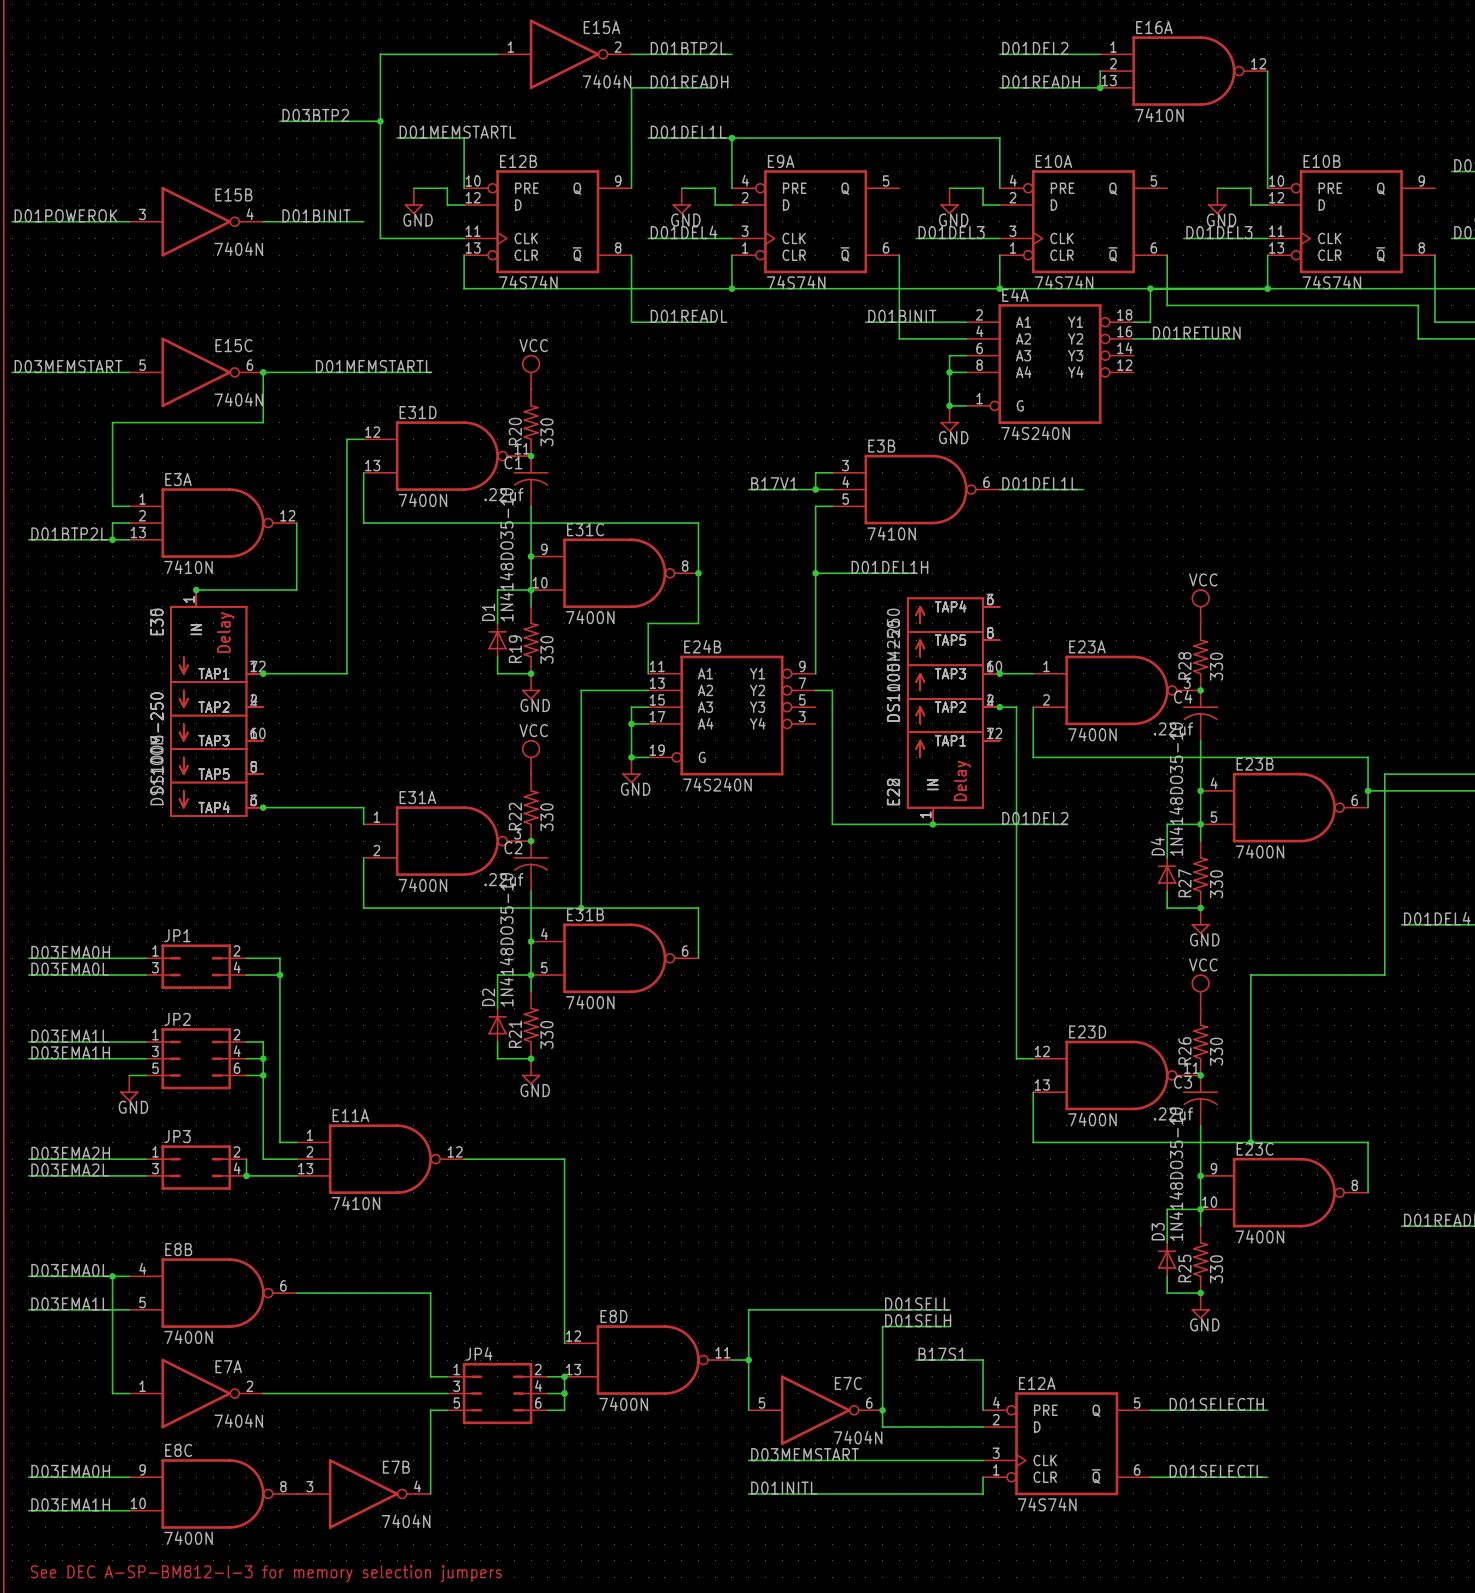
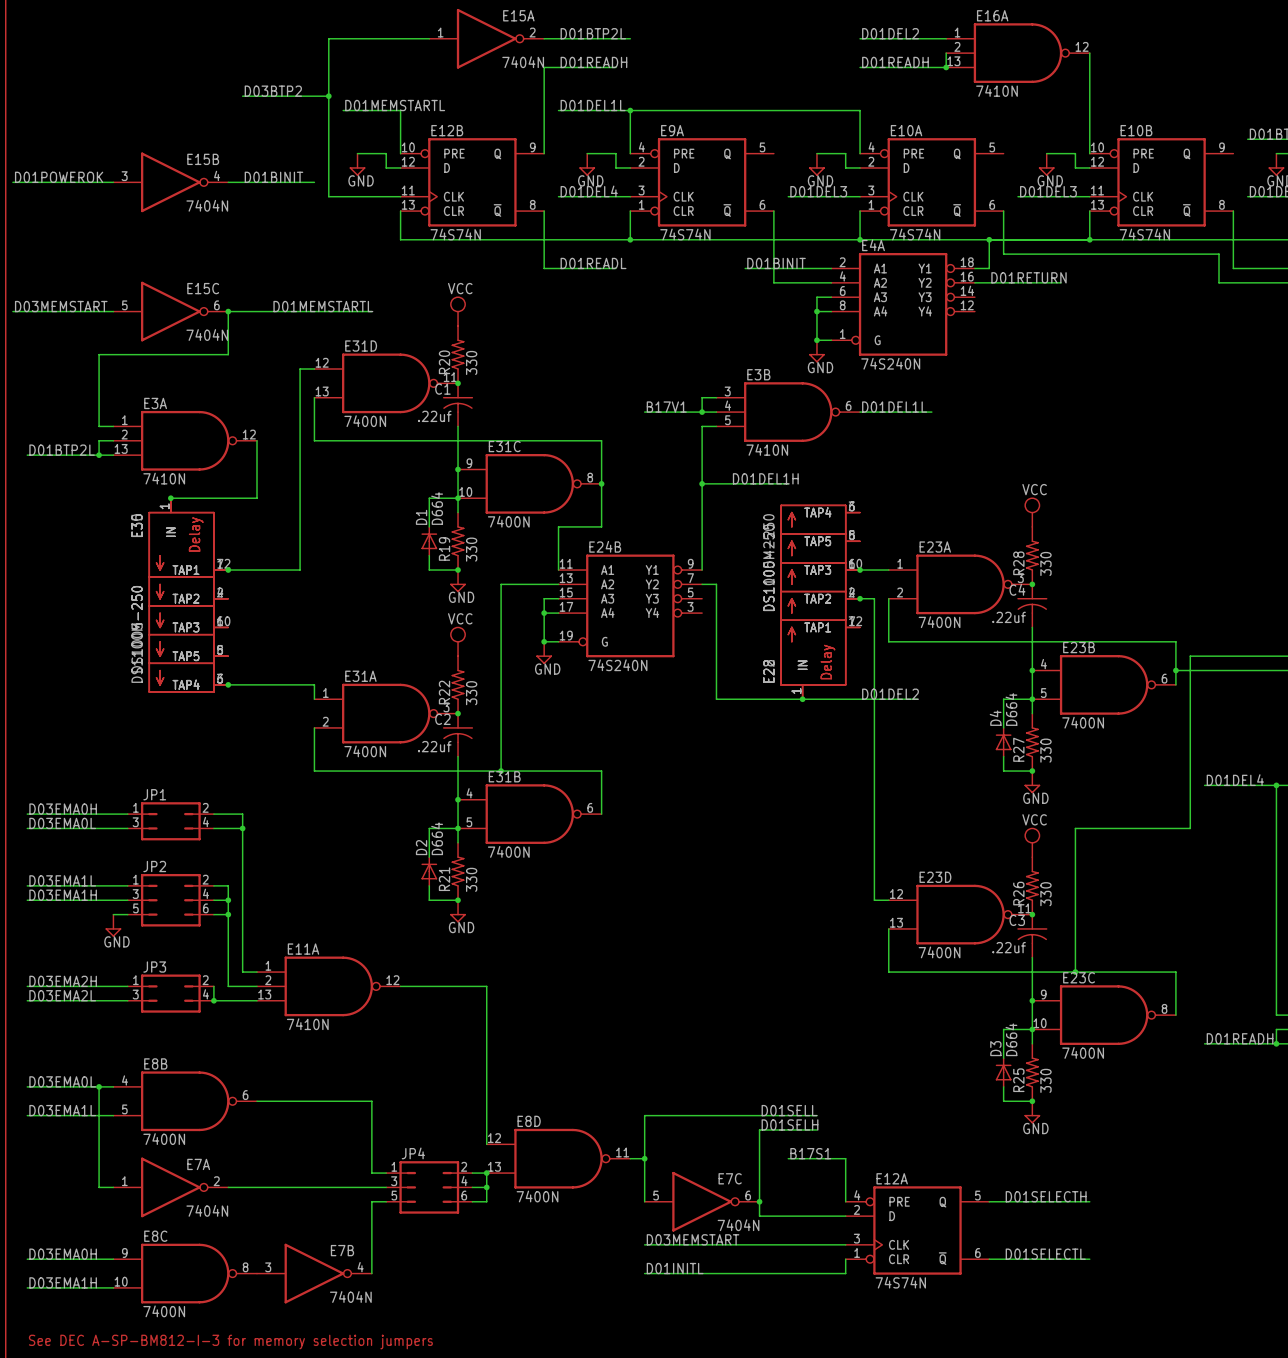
D1 value: 1N4148DO35-10 (506, 554) -> D664 (437, 508)
D4 value: 1N4148DO35-10 (1176, 789) -> D664 (1011, 709)
D2 value: 1N4148DO35-10 (506, 939) -> D664 (437, 838)
D3 value: 1N4148DO35-10 (1176, 1174) -> D664 (1011, 1039)

